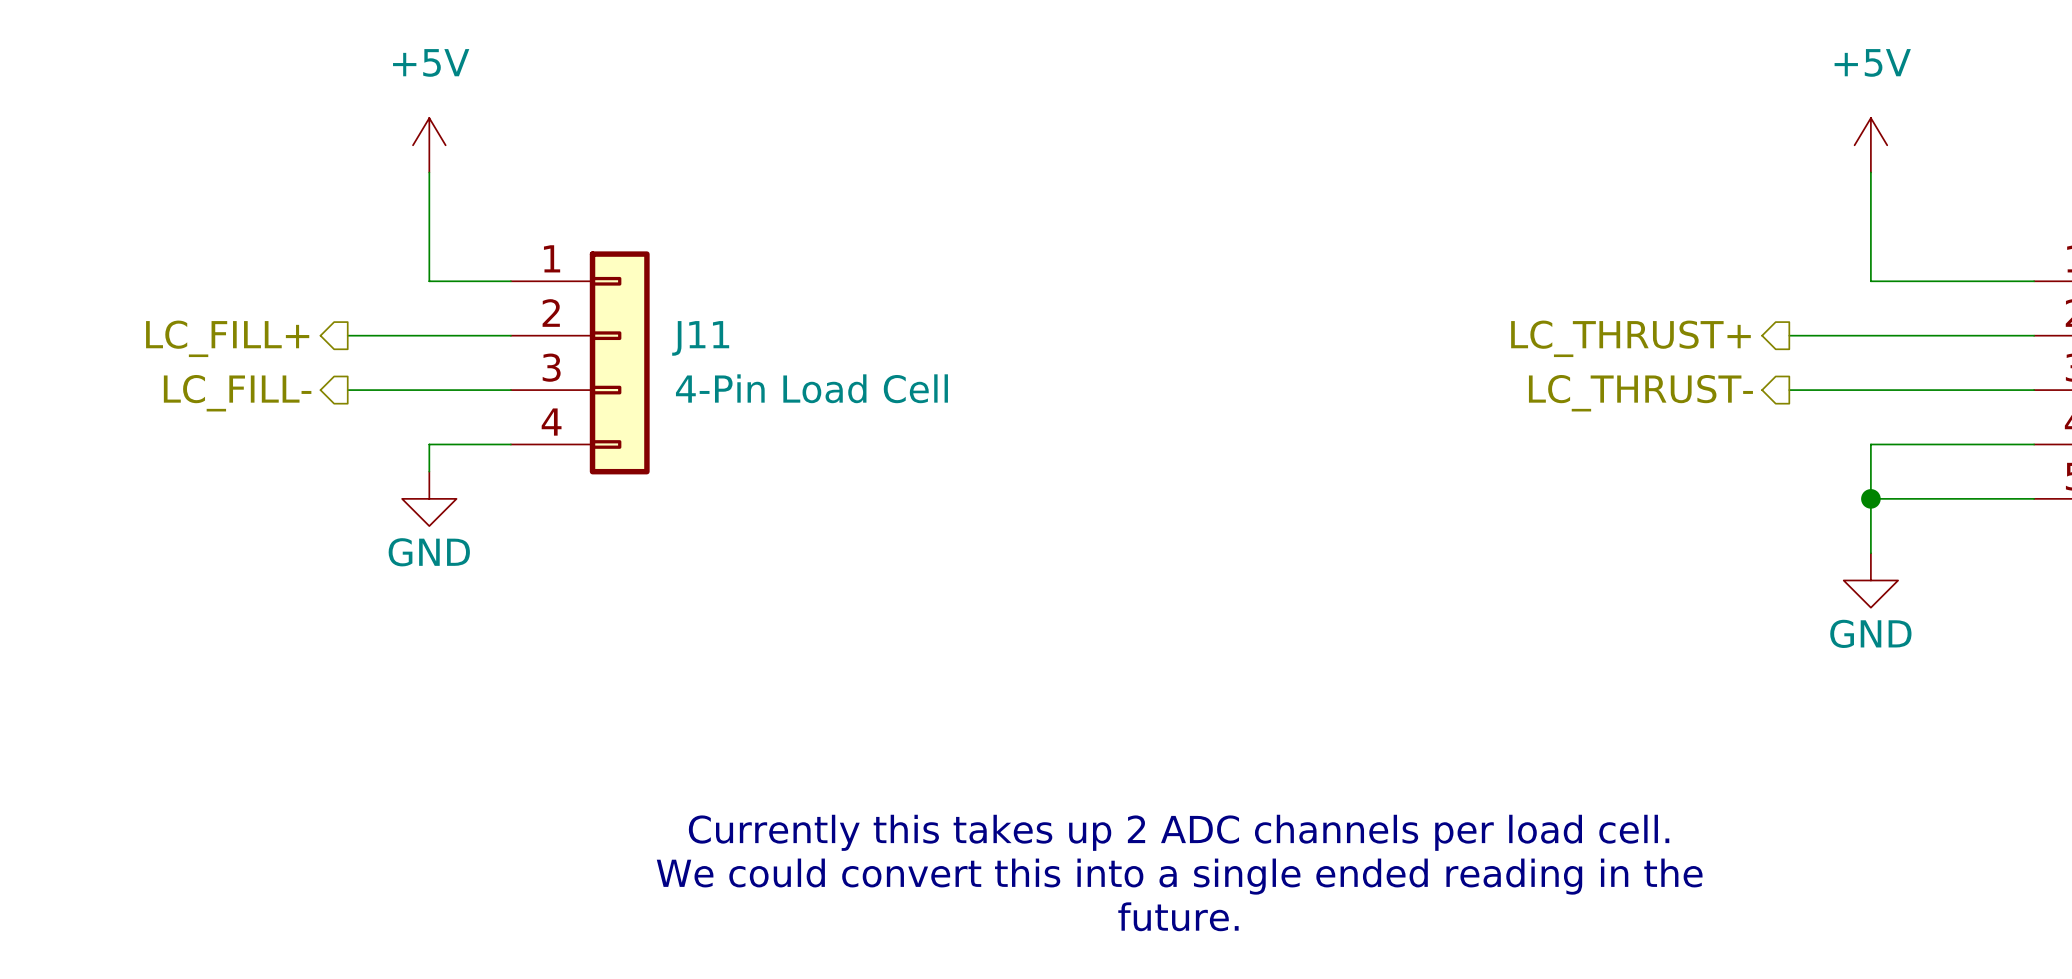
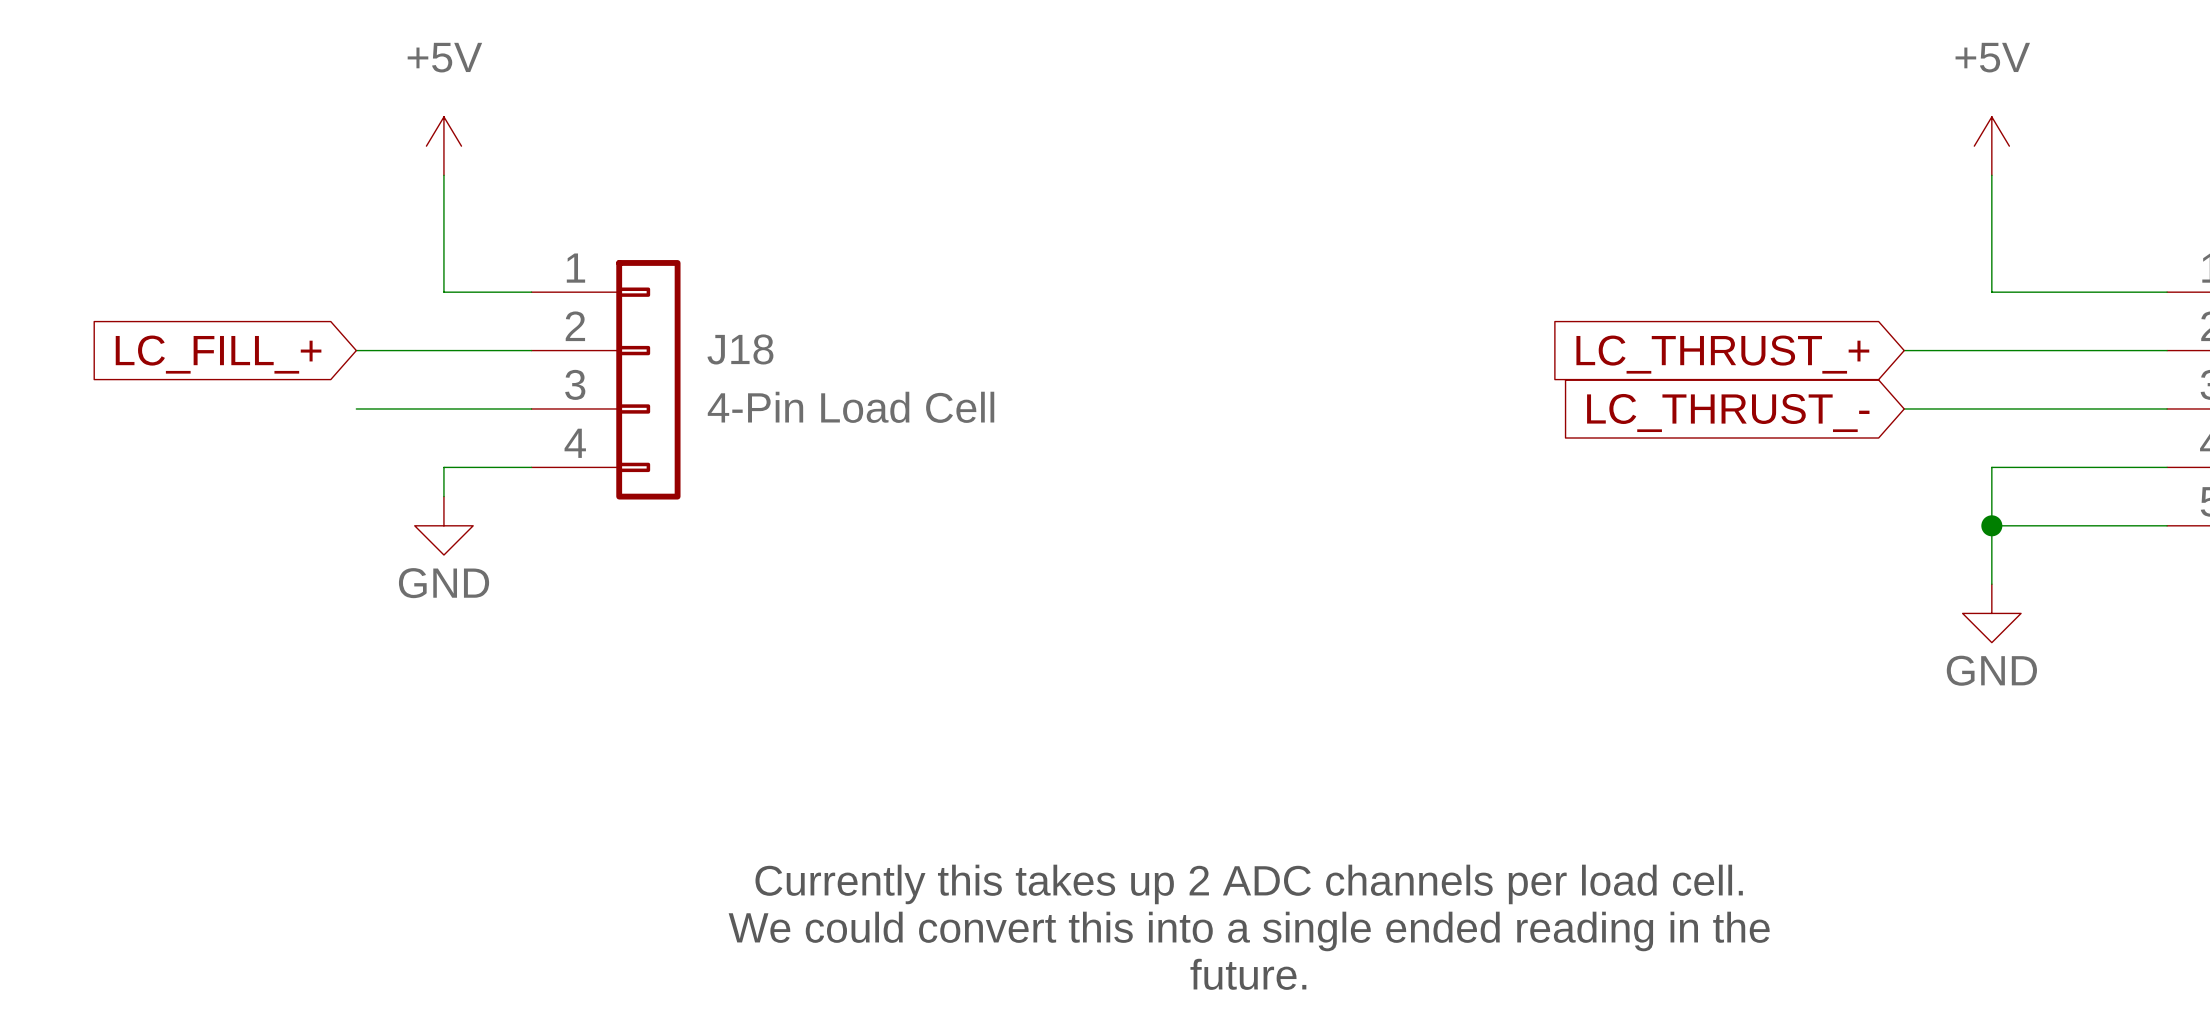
hierarchical label: LC_FILL+ (227, 338) -> none
J11 name: J11 (700, 338) -> J18 (740, 349)
hierarchical label: LC_THRUST+ (1630, 338) -> none
global label: none -> LC_FILL_+ (218, 354)
global label: none -> LC_THRUST_+ (1722, 354)
hierarchical label: LC_FILL- (237, 393) -> none
hierarchical label: LC_THRUST- (1640, 393) -> none
global label: none -> LC_THRUST_- (1728, 412)

